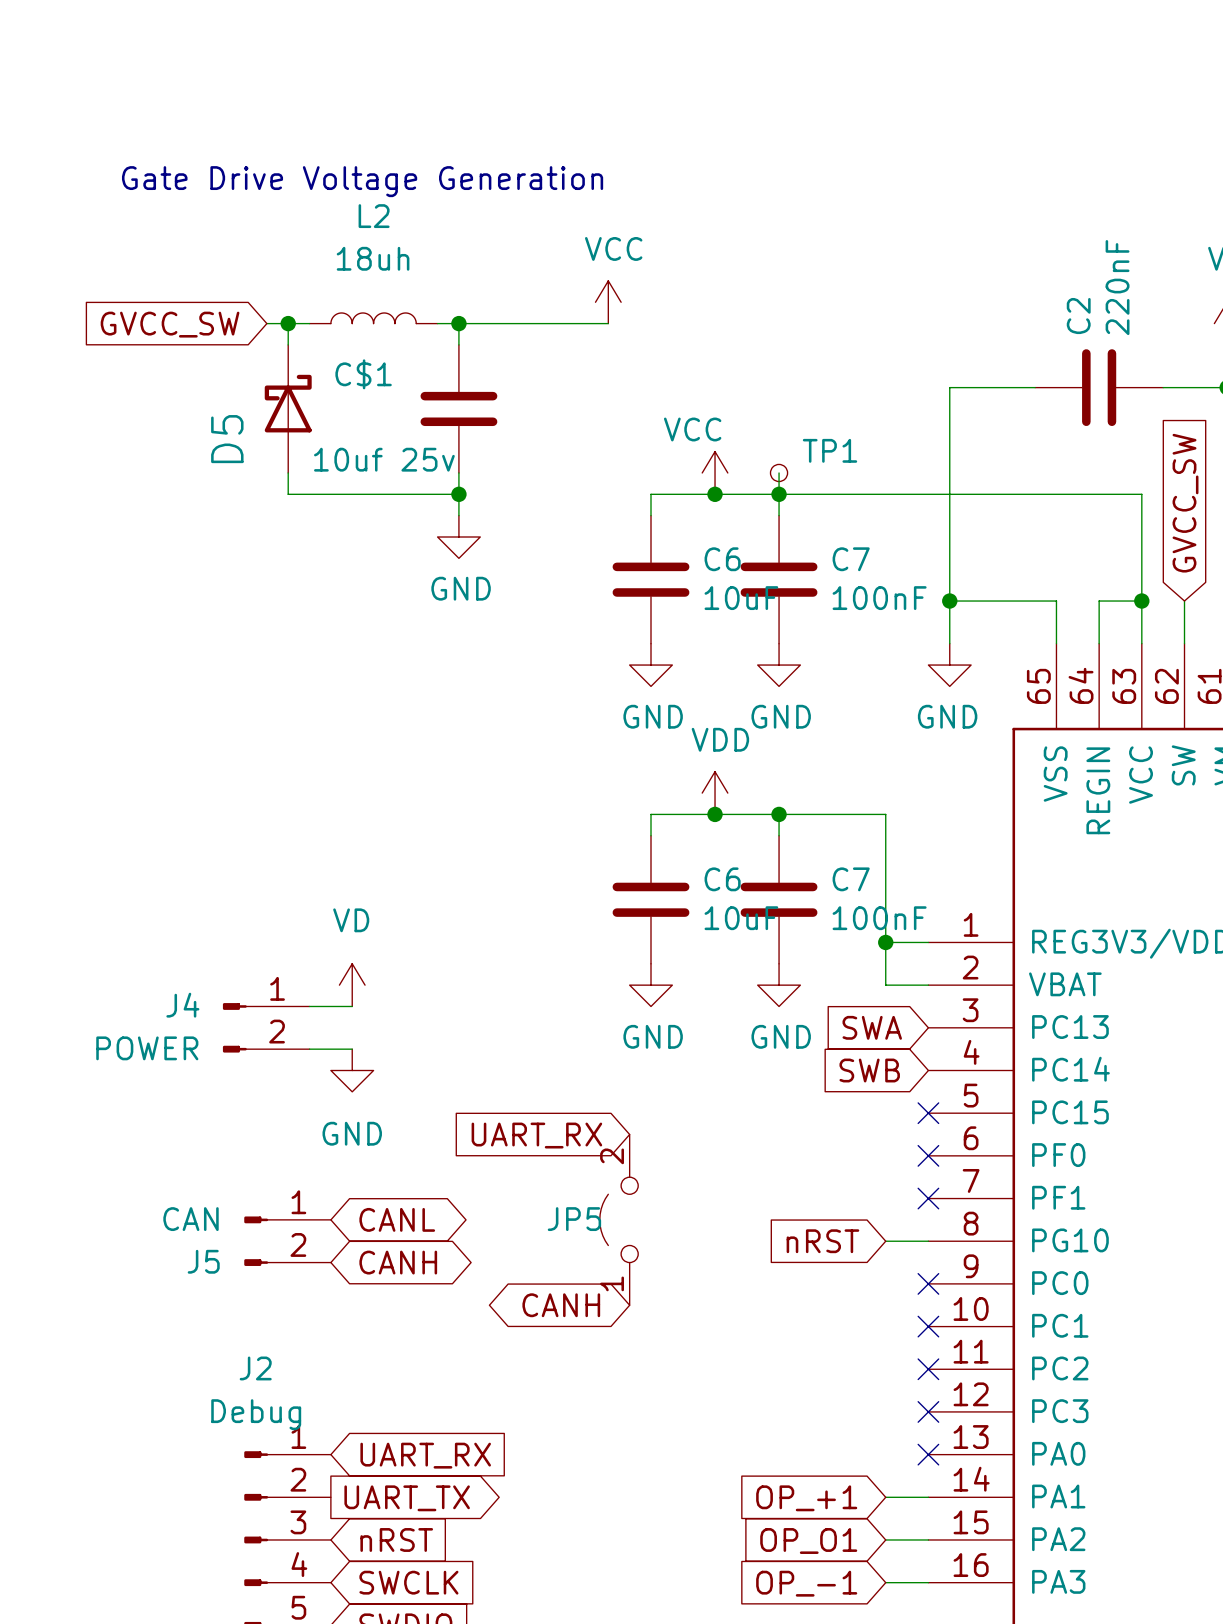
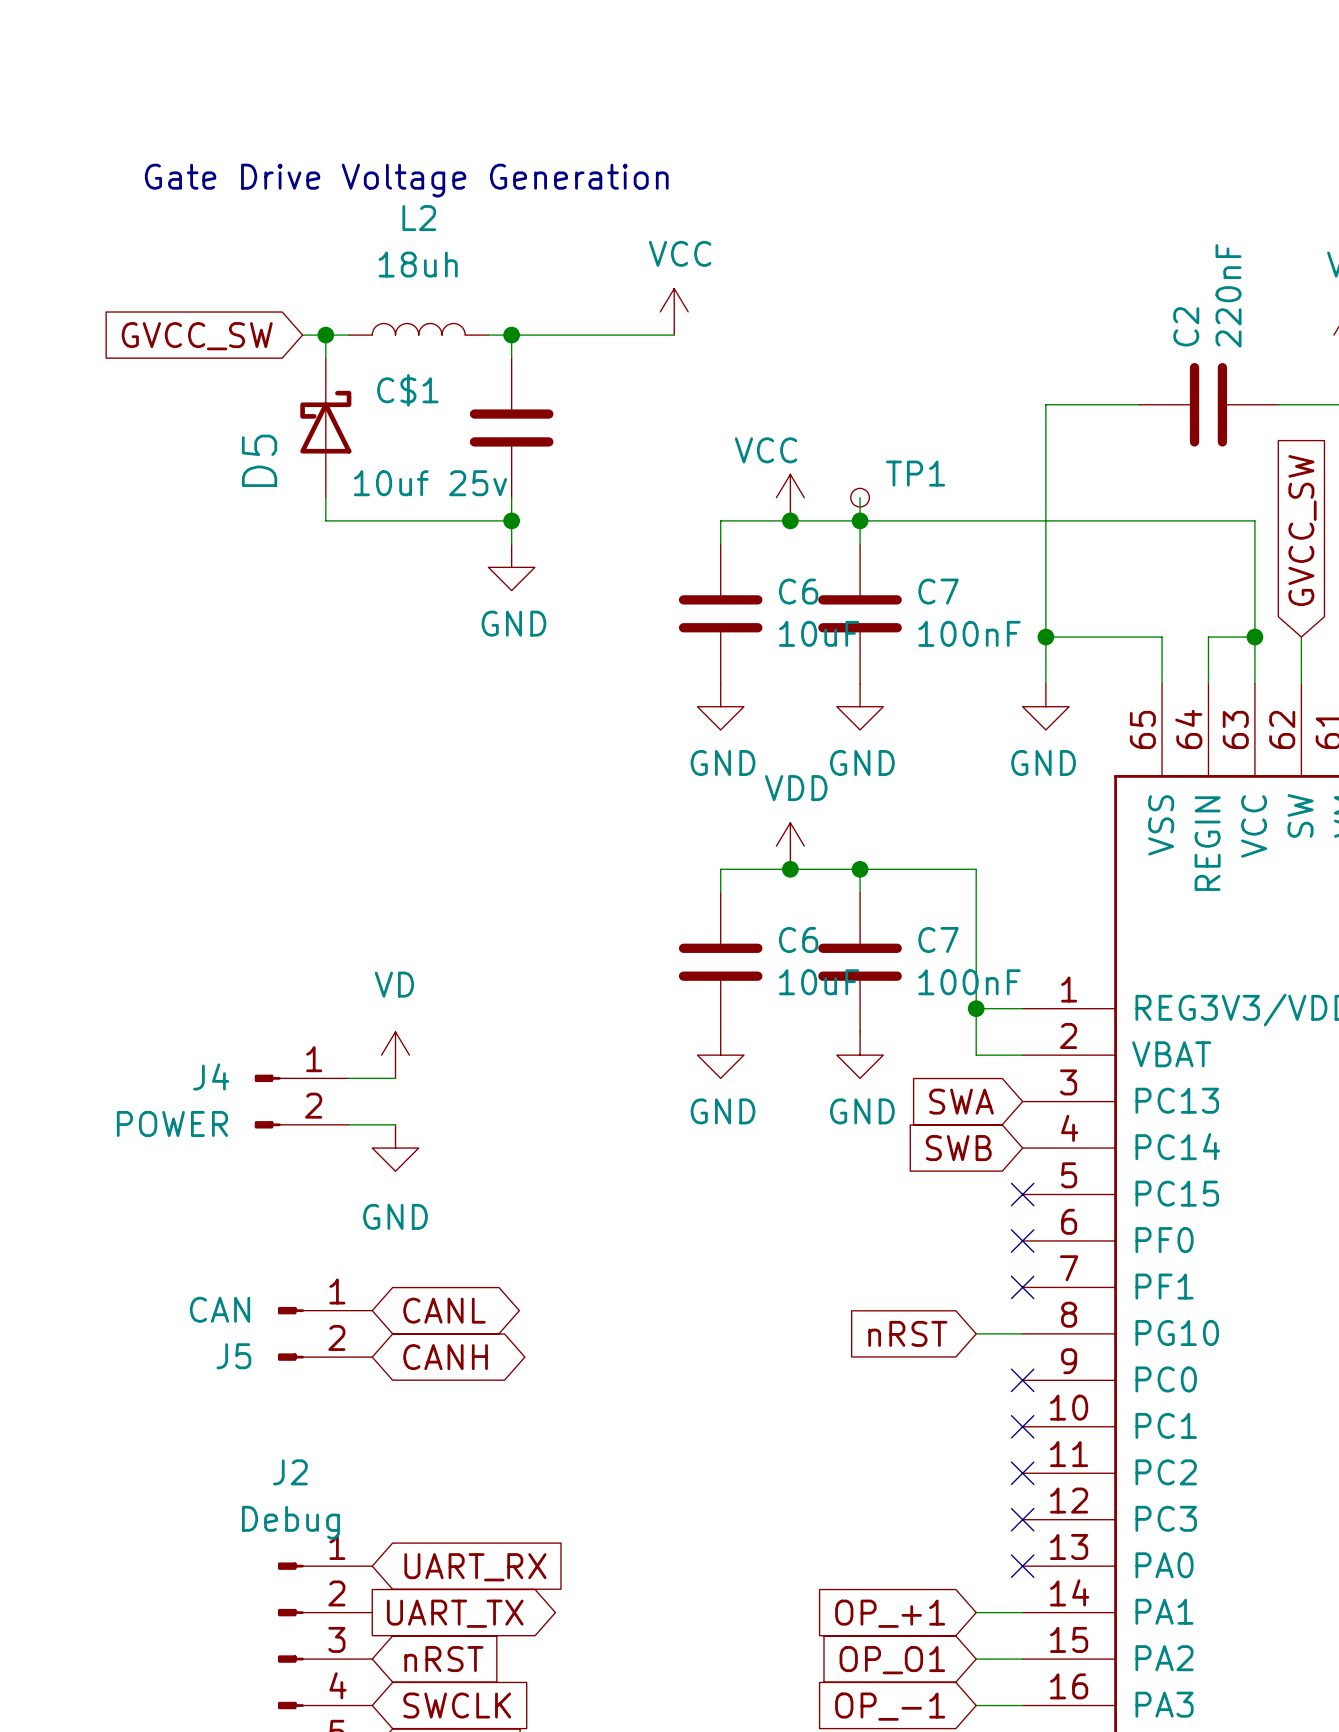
global label: UART_RX (536, 1135) -> none
JP5: (618, 1219) -> none
global label: CANH (561, 1305) -> none

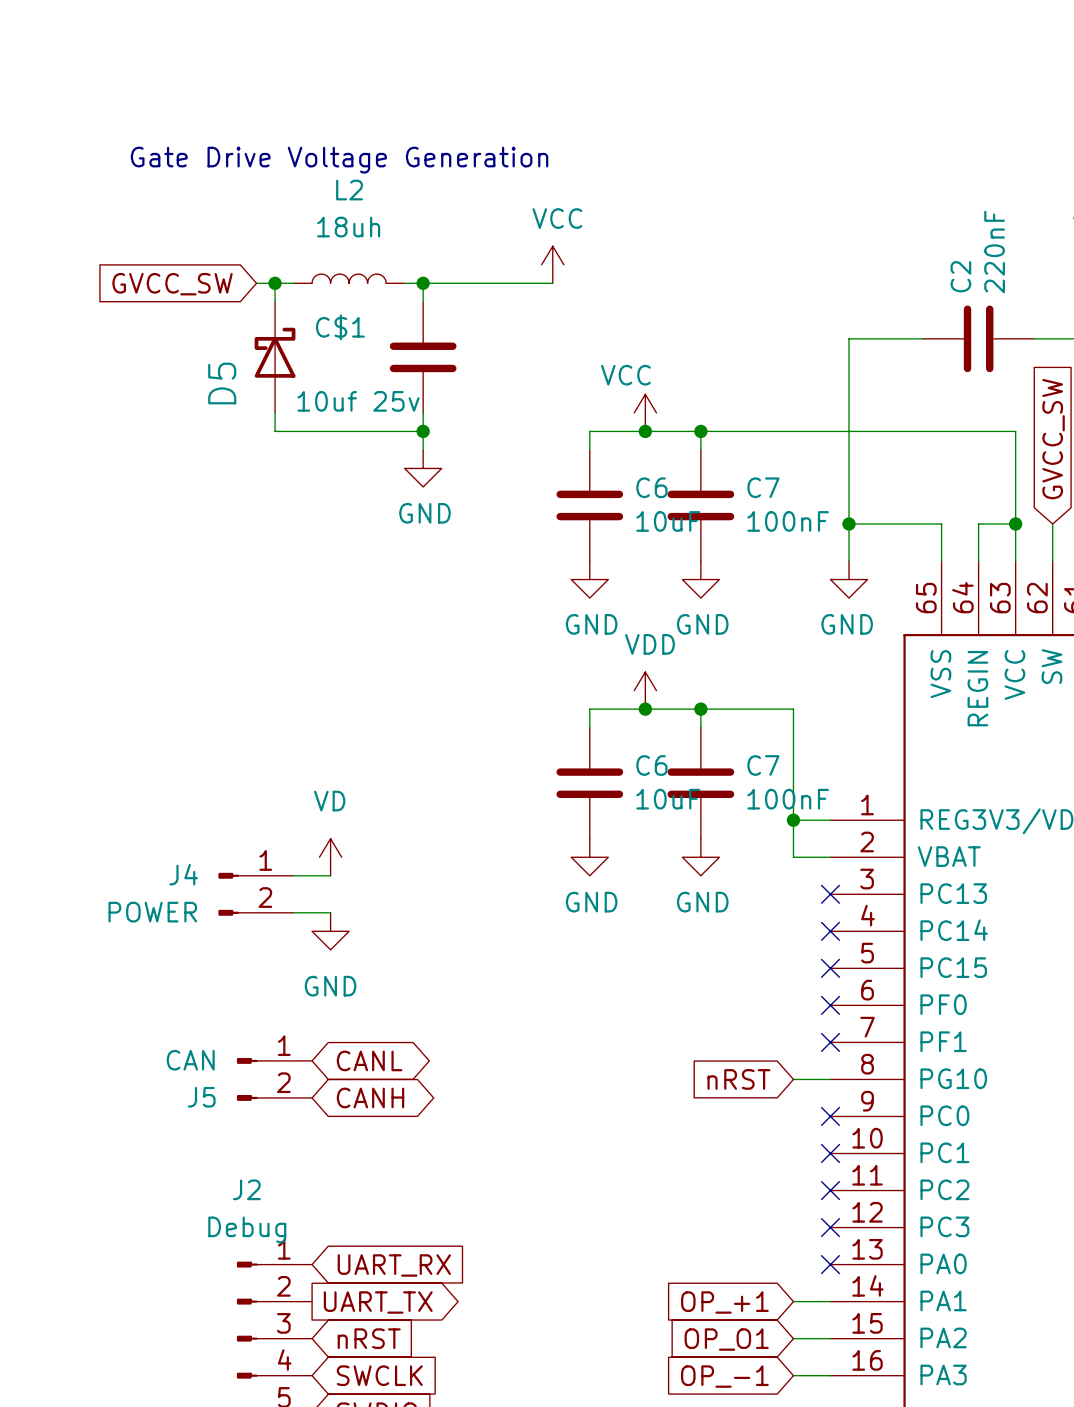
wire: (860, 497) (860, 520) -> none
TP1: (860, 497) -> none
global label: SWA (961, 1101) -> none
no-connect mark: none -> (830, 894)
global label: SWB (958, 1148) -> none
no-connect mark: none -> (830, 931)

